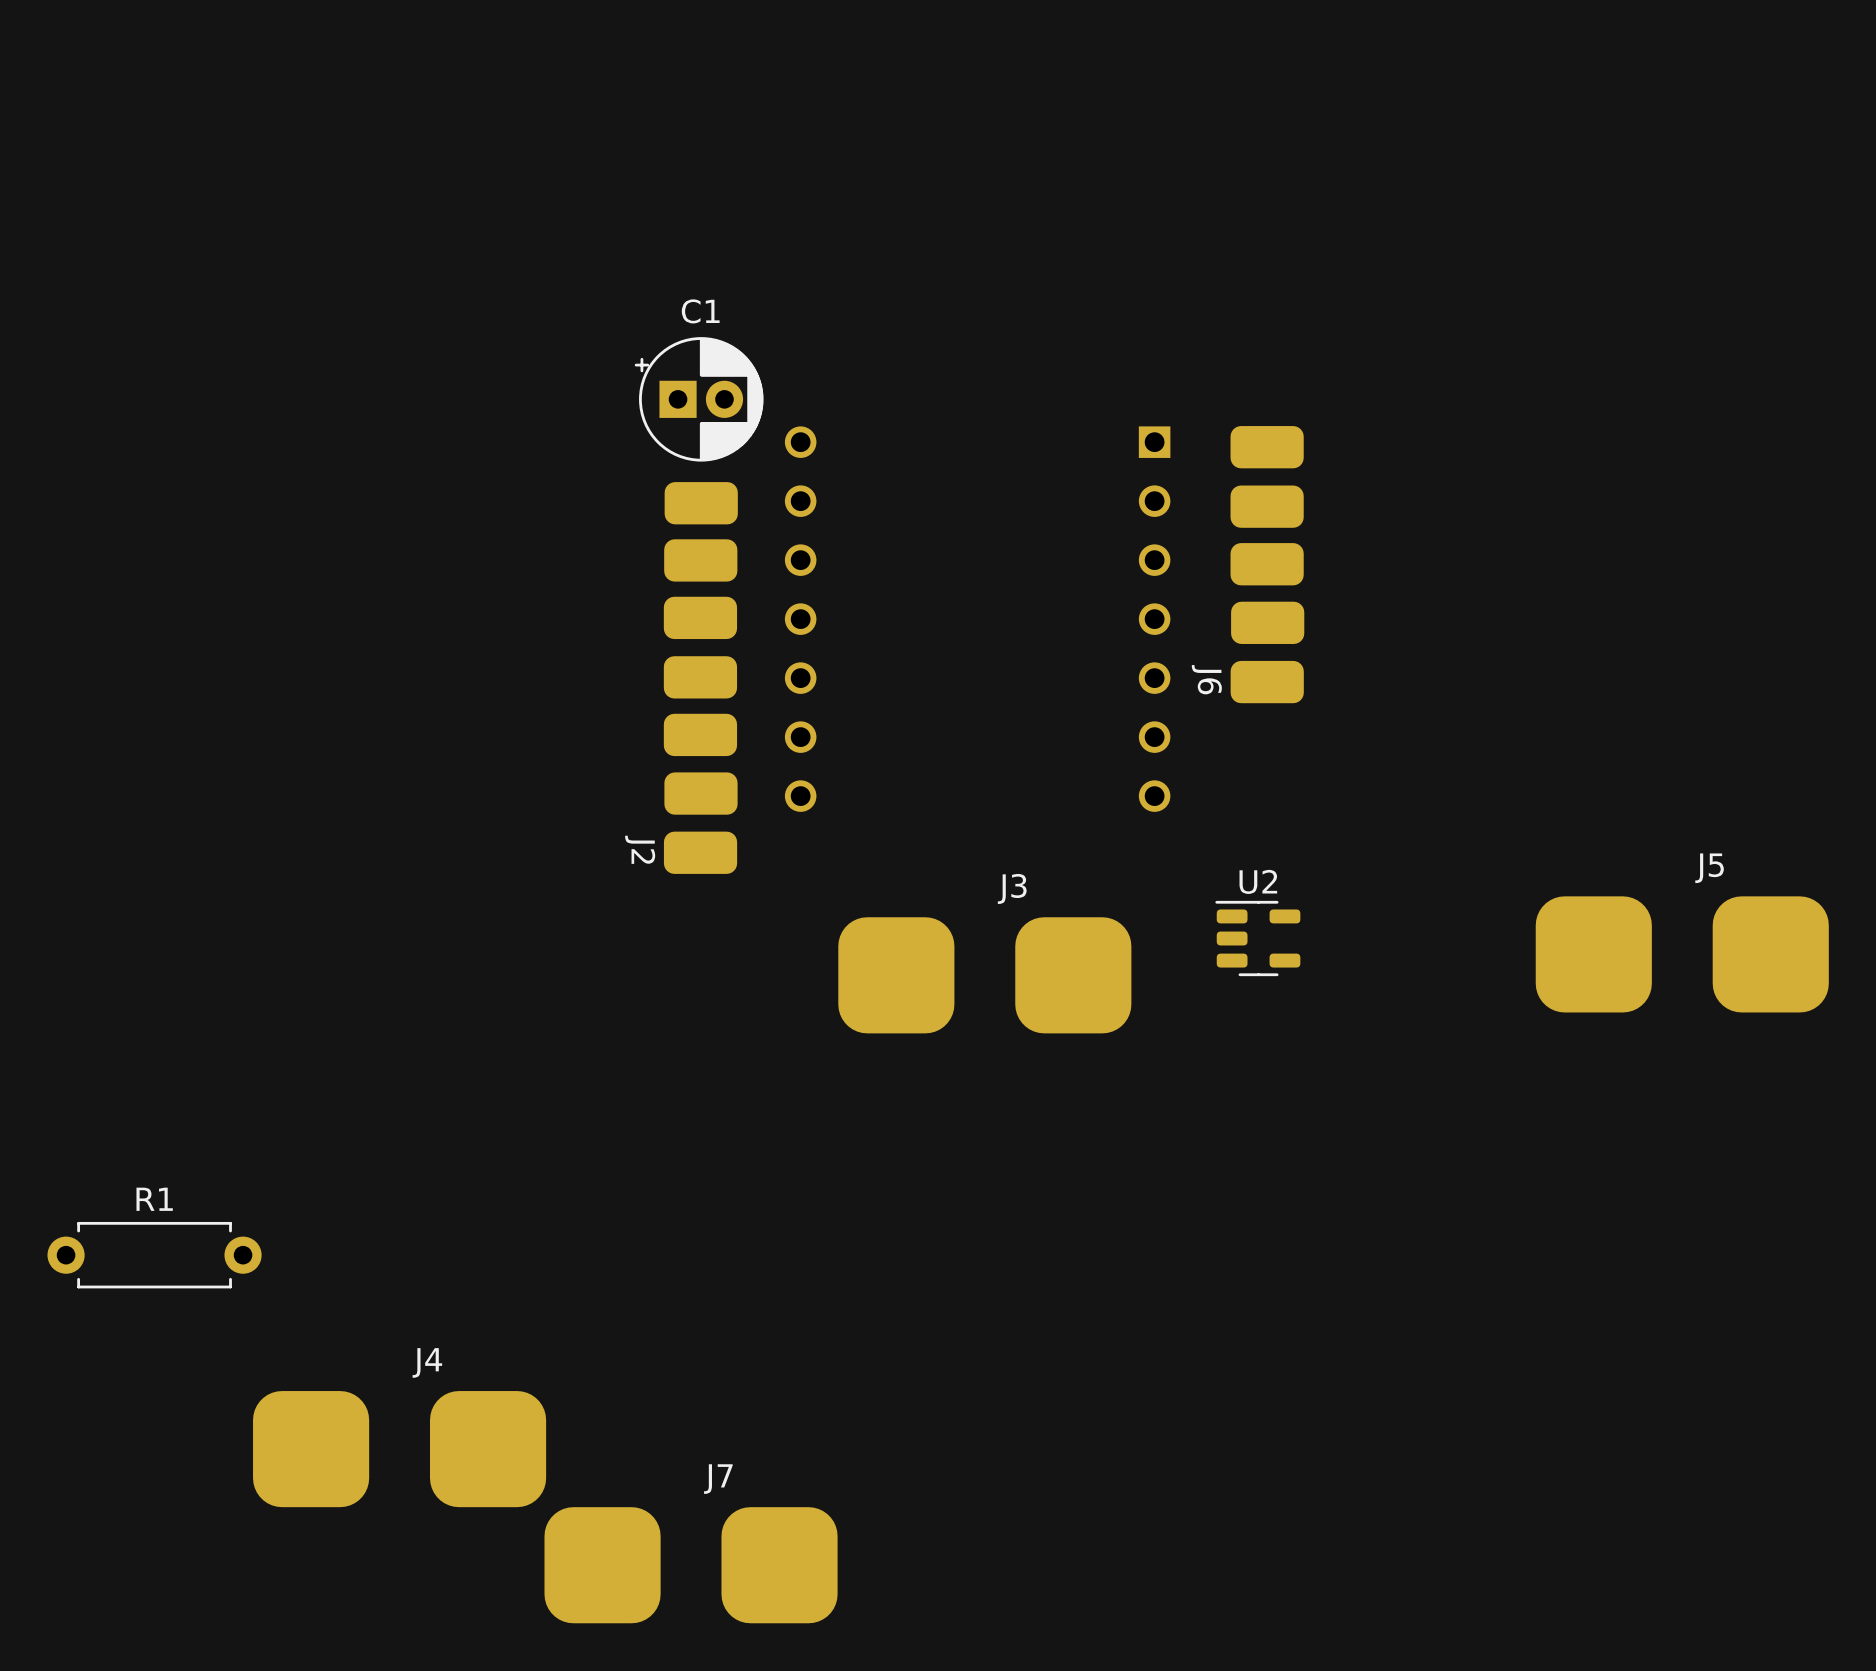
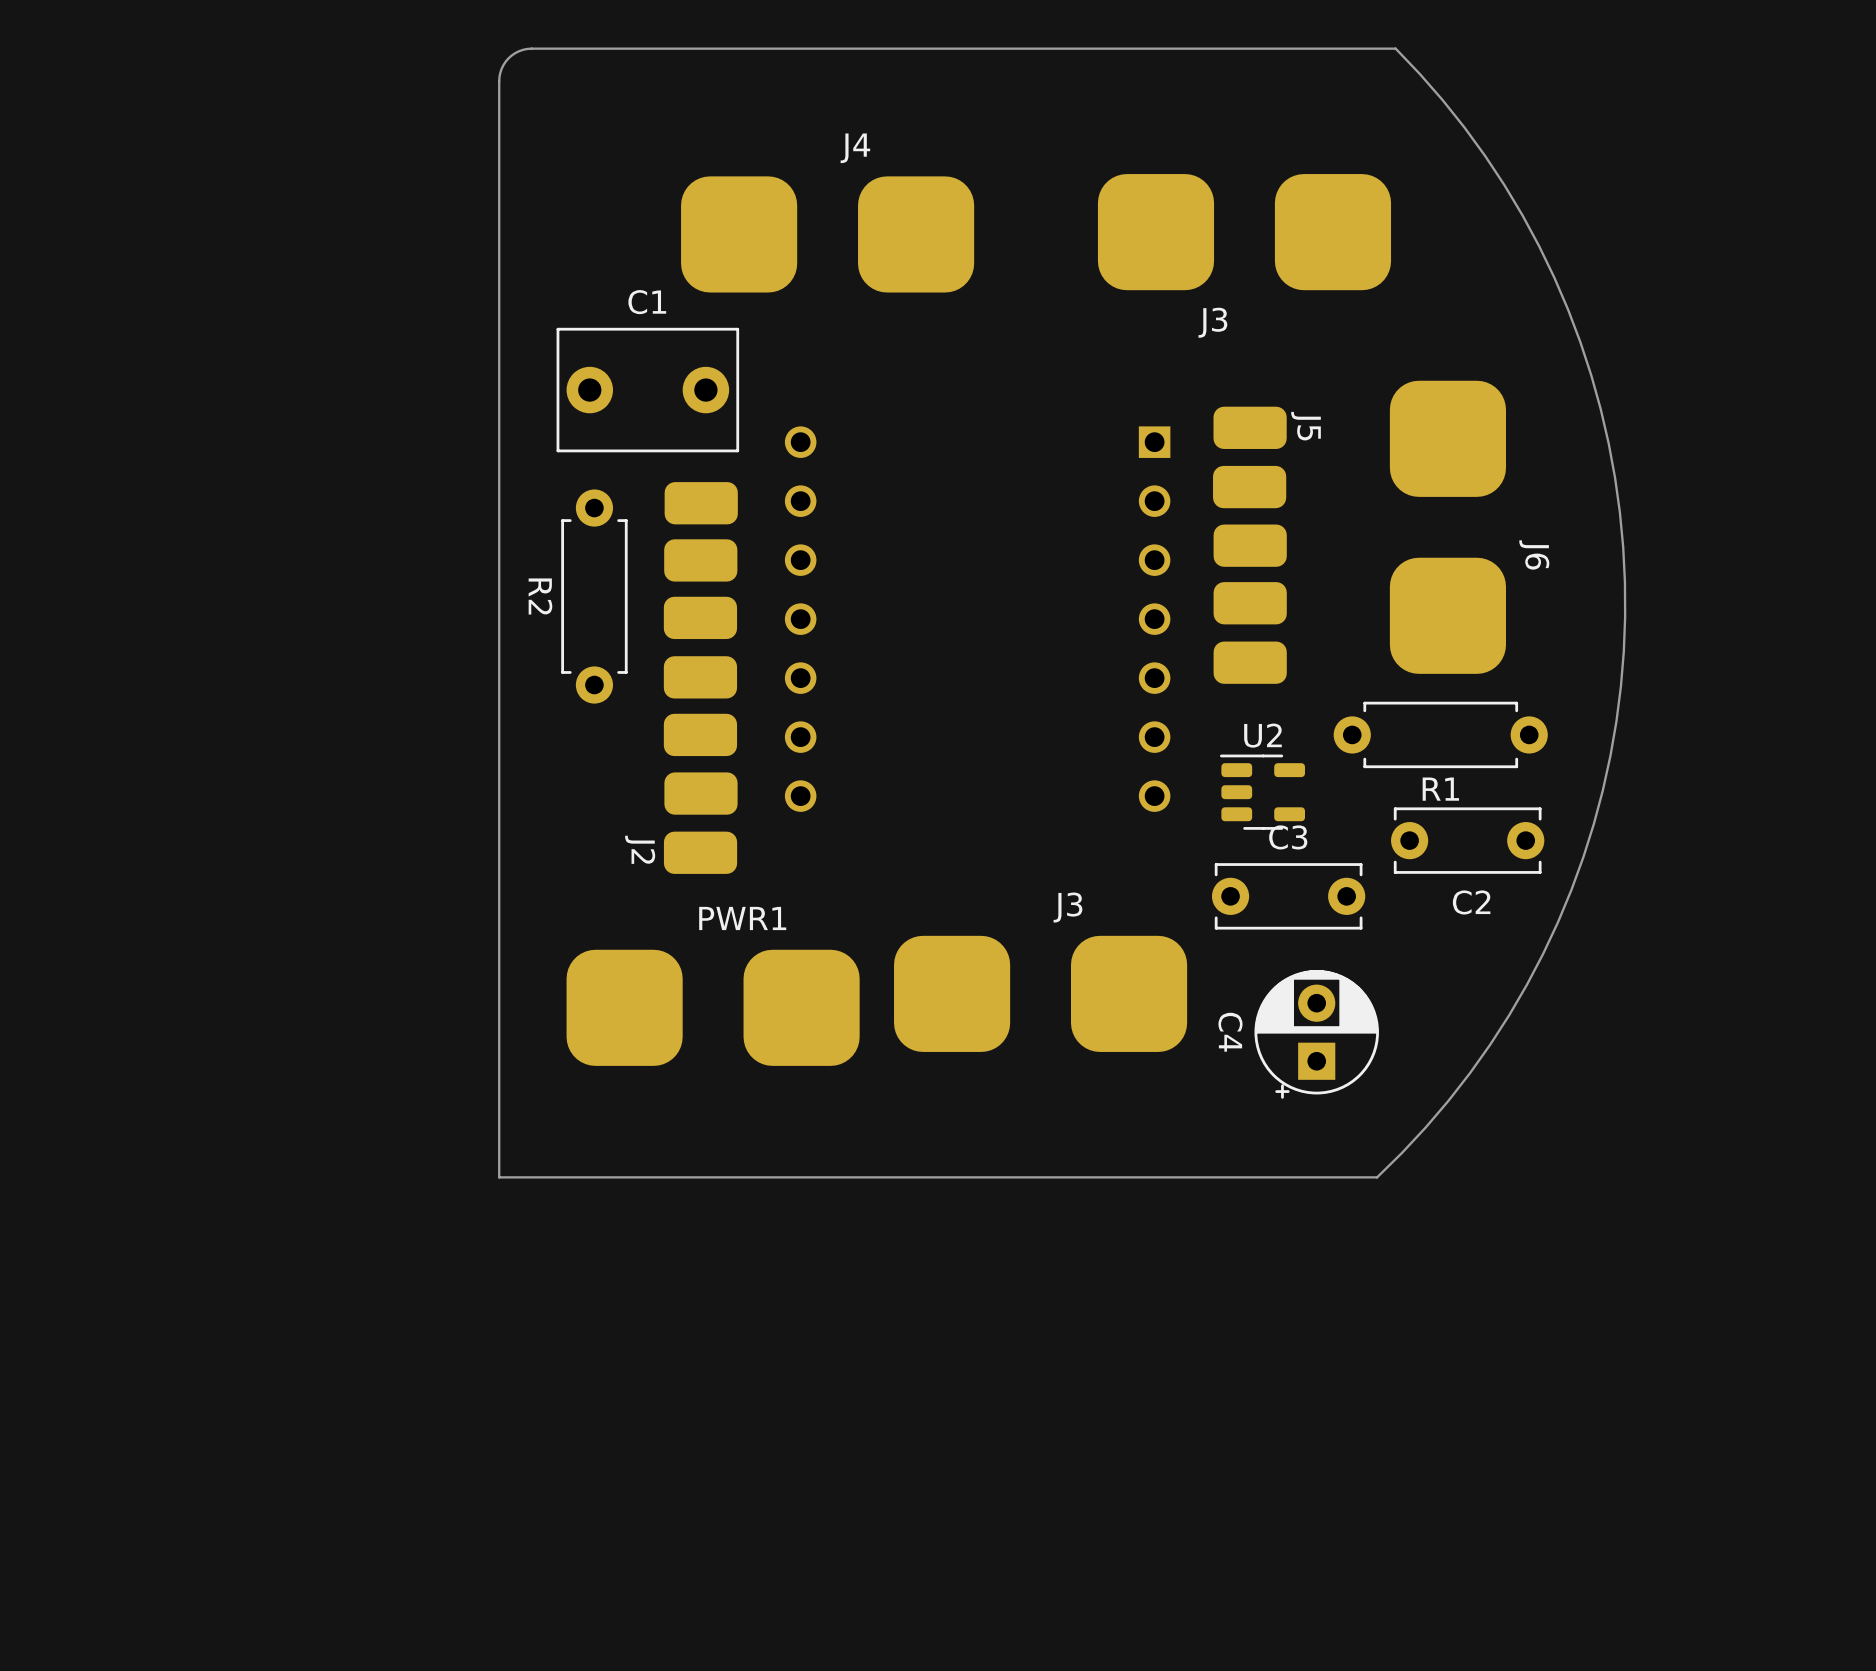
board edge: none -> (1395, 48) (531, 48) (519, 51) (505, 61) (501, 68) (499, 81) (499, 1177) (1377, 1177) (1425, 1127) (1448, 1100) (1490, 1044) (1526, 984) (1557, 922) (1583, 857) (1602, 790) (1616, 721) (1620, 686) (1625, 616) (1623, 547) (1615, 477) (1600, 409) (1580, 342) (1554, 277) (1522, 215) (1485, 155) (1442, 100) (1395, 48)
J3: none -> (1244, 232)
C1 footprint: [634, 337, 764, 462] -> [556, 327, 740, 453]
J6 footprint: [1230, 426, 1305, 704] -> [1389, 380, 1507, 674]
R2: none -> (594, 596)
J6 name position: J6 (1206, 679) -> J6 (1534, 554)
C2: none -> (1467, 840)
C3: none -> (1288, 896)
J5 footprint: [1535, 896, 1829, 1013] -> [1213, 406, 1287, 684]
U2 position: (1257, 938) -> (1262, 792)
J3 position: (984, 975) -> (1040, 993)
PWR1: none -> (713, 1007)
C4: none -> (1316, 1034)
R1 name position: R1 (154, 1199) -> R1 (1440, 789)
R1 position: (154, 1255) -> (1440, 734)
J4 position: (399, 1449) -> (827, 234)
J7: (691, 1565) -> none

